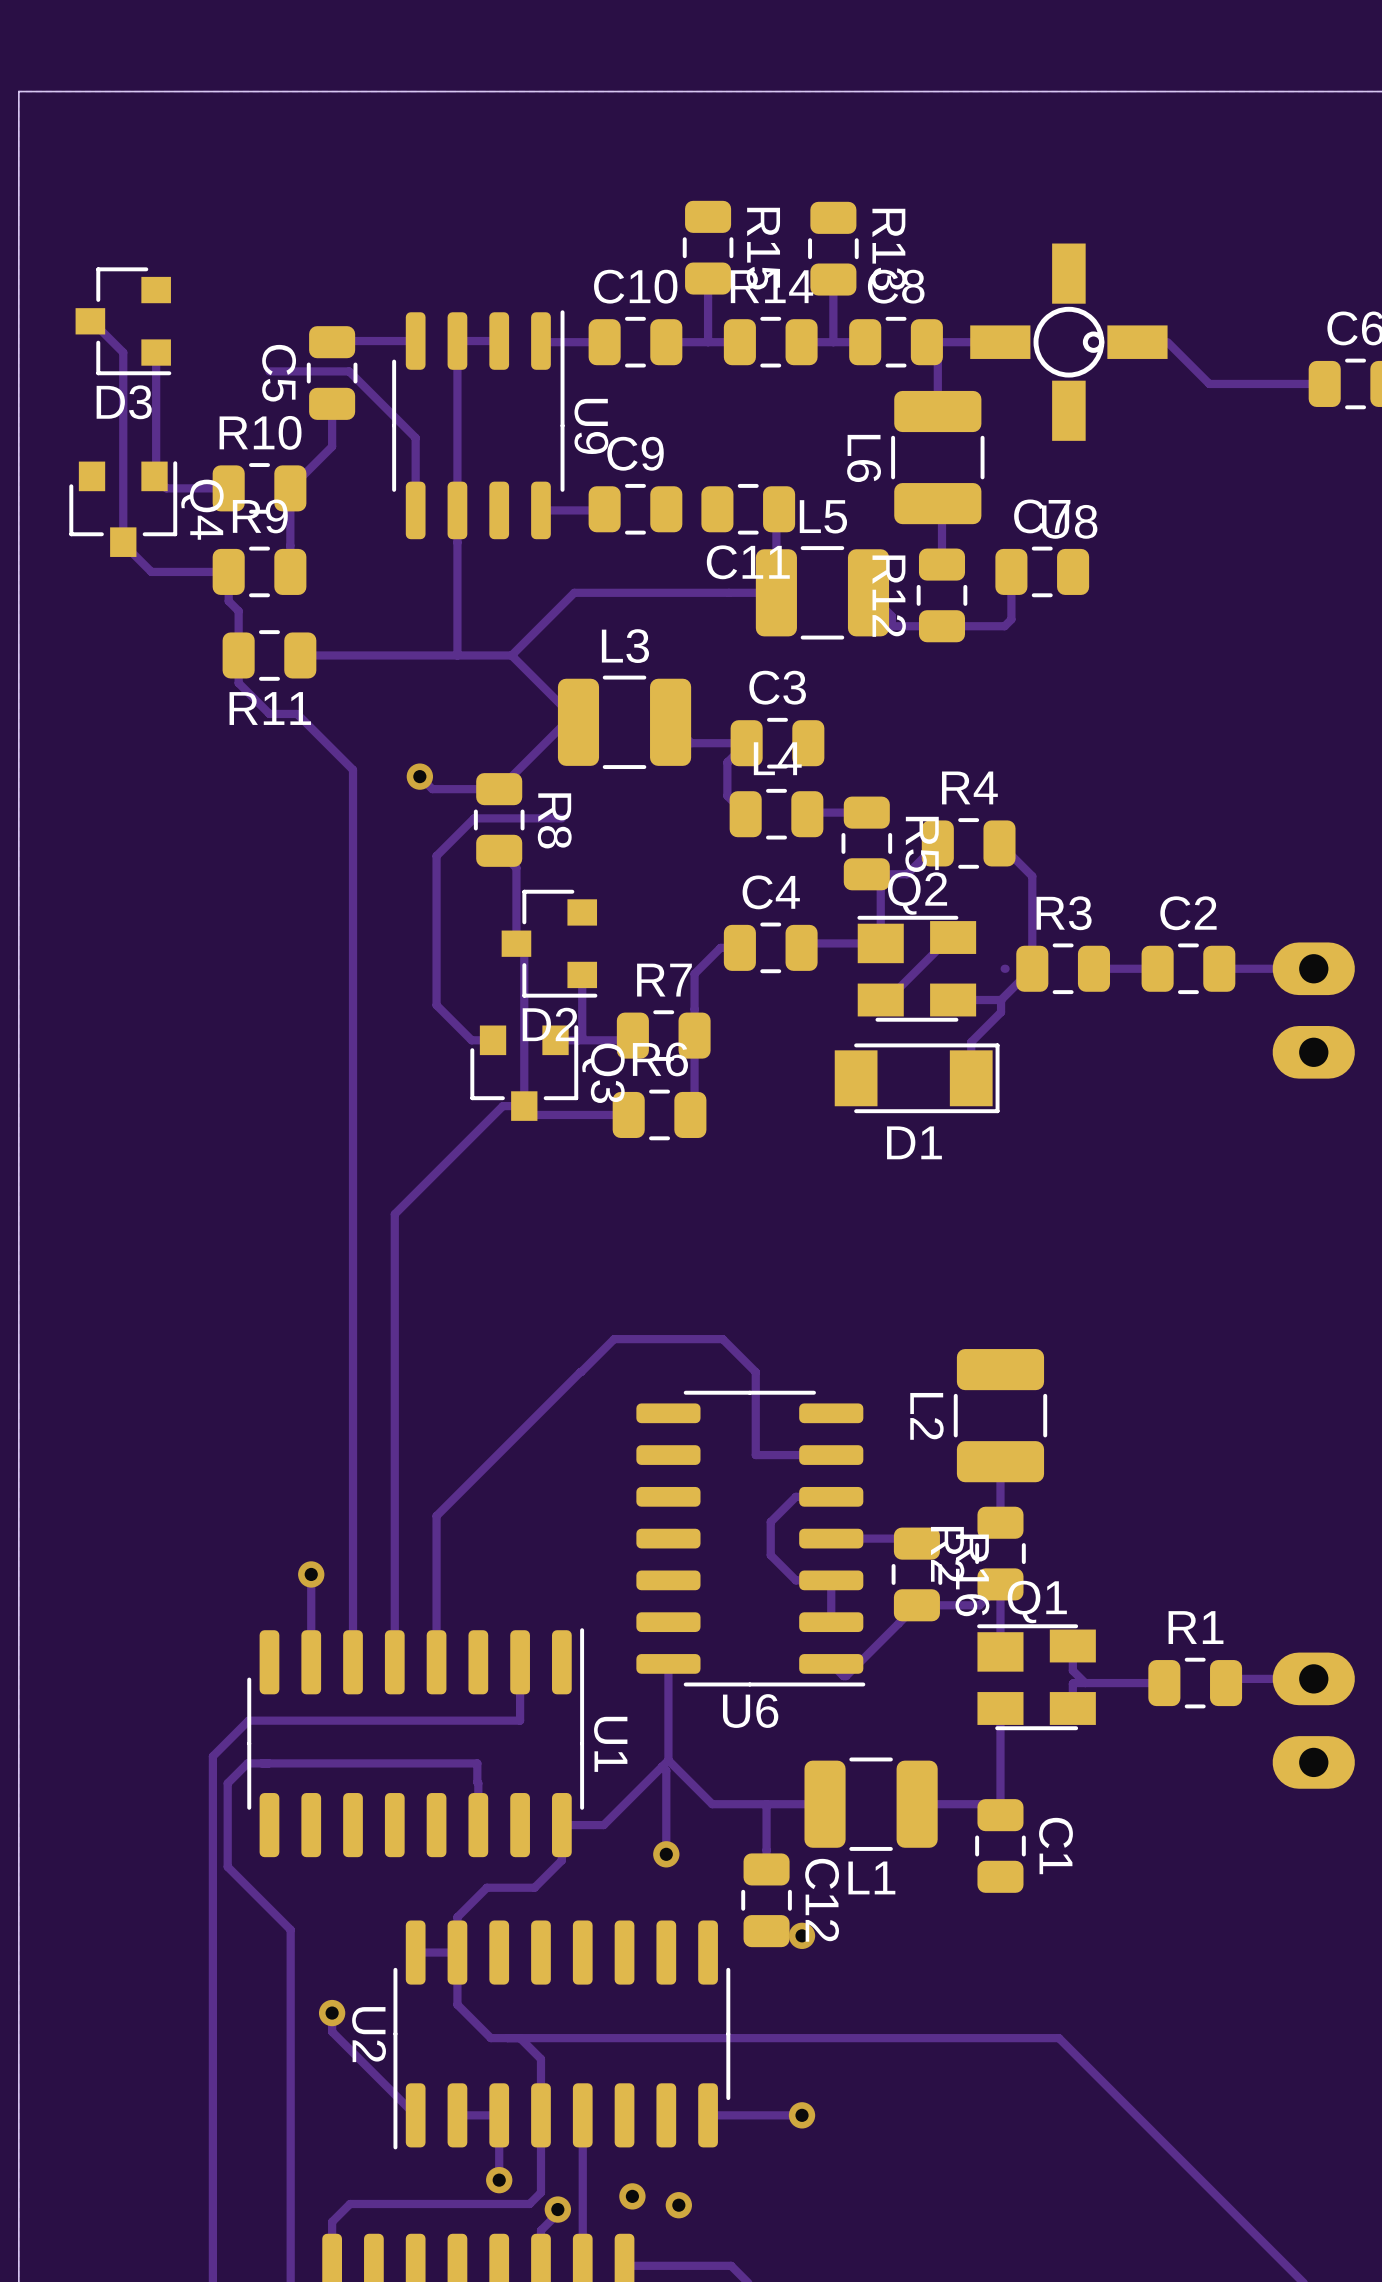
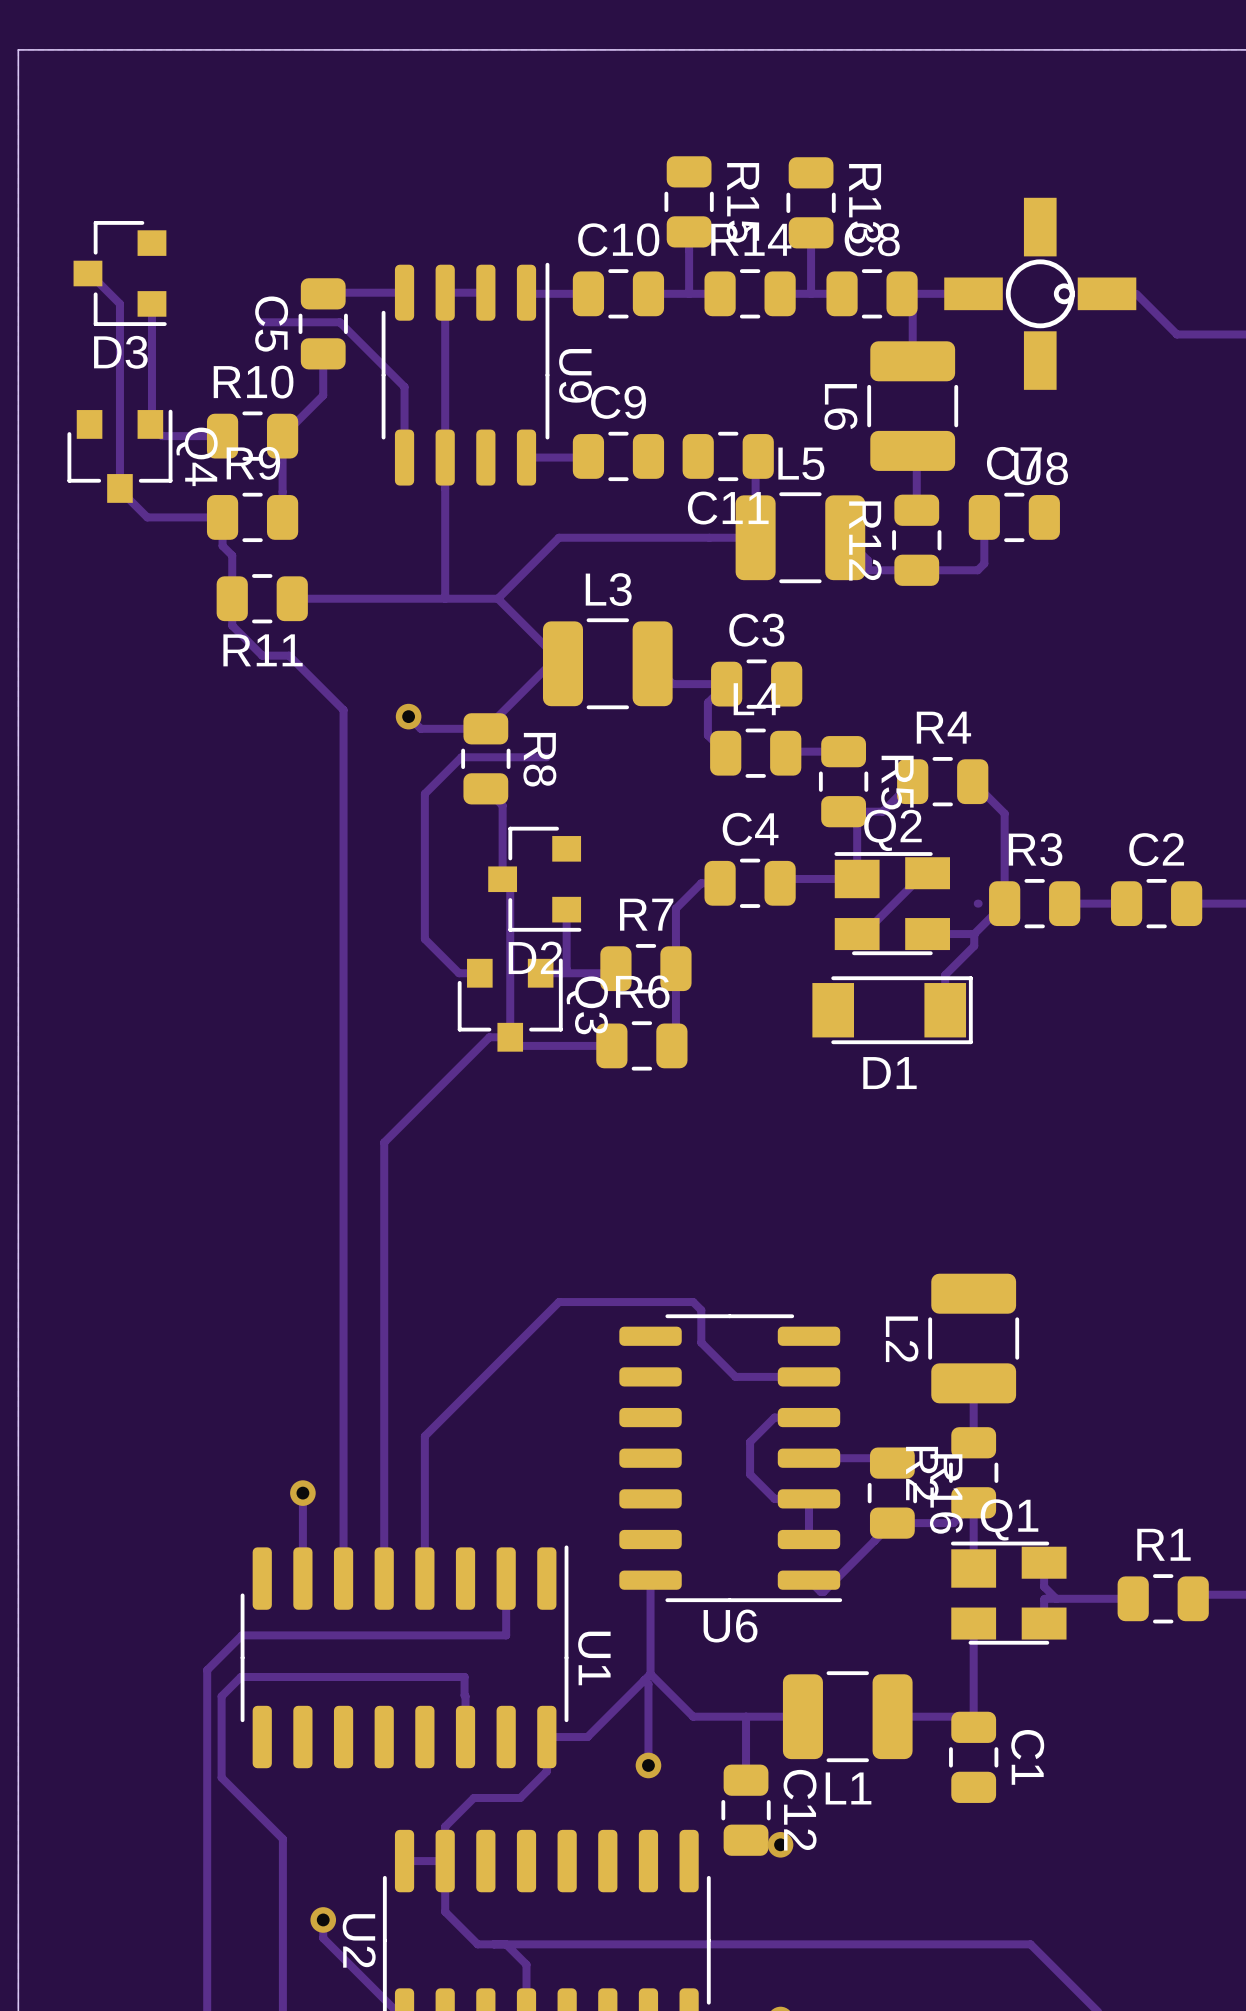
track: (574, 1378) (614, 1339) (722, 1339) (755, 1372) (755, 1455) -> (559, 1302) (693, 1302) (701, 1310) (701, 1342) (735, 1376)

